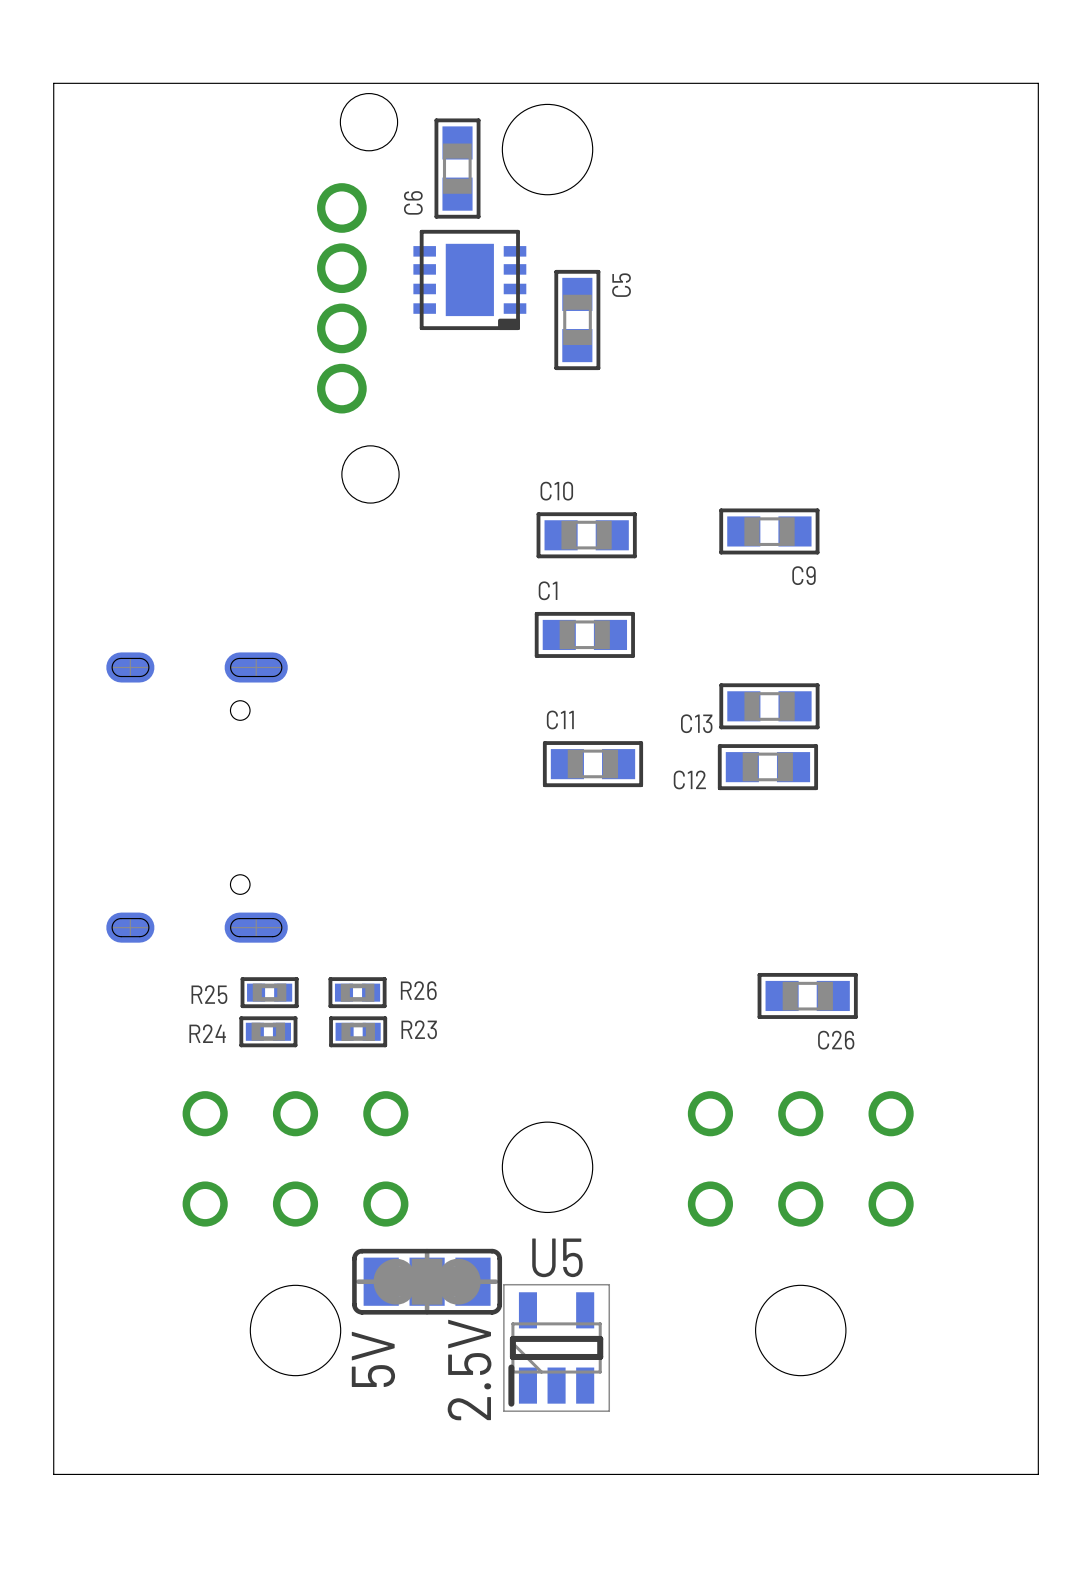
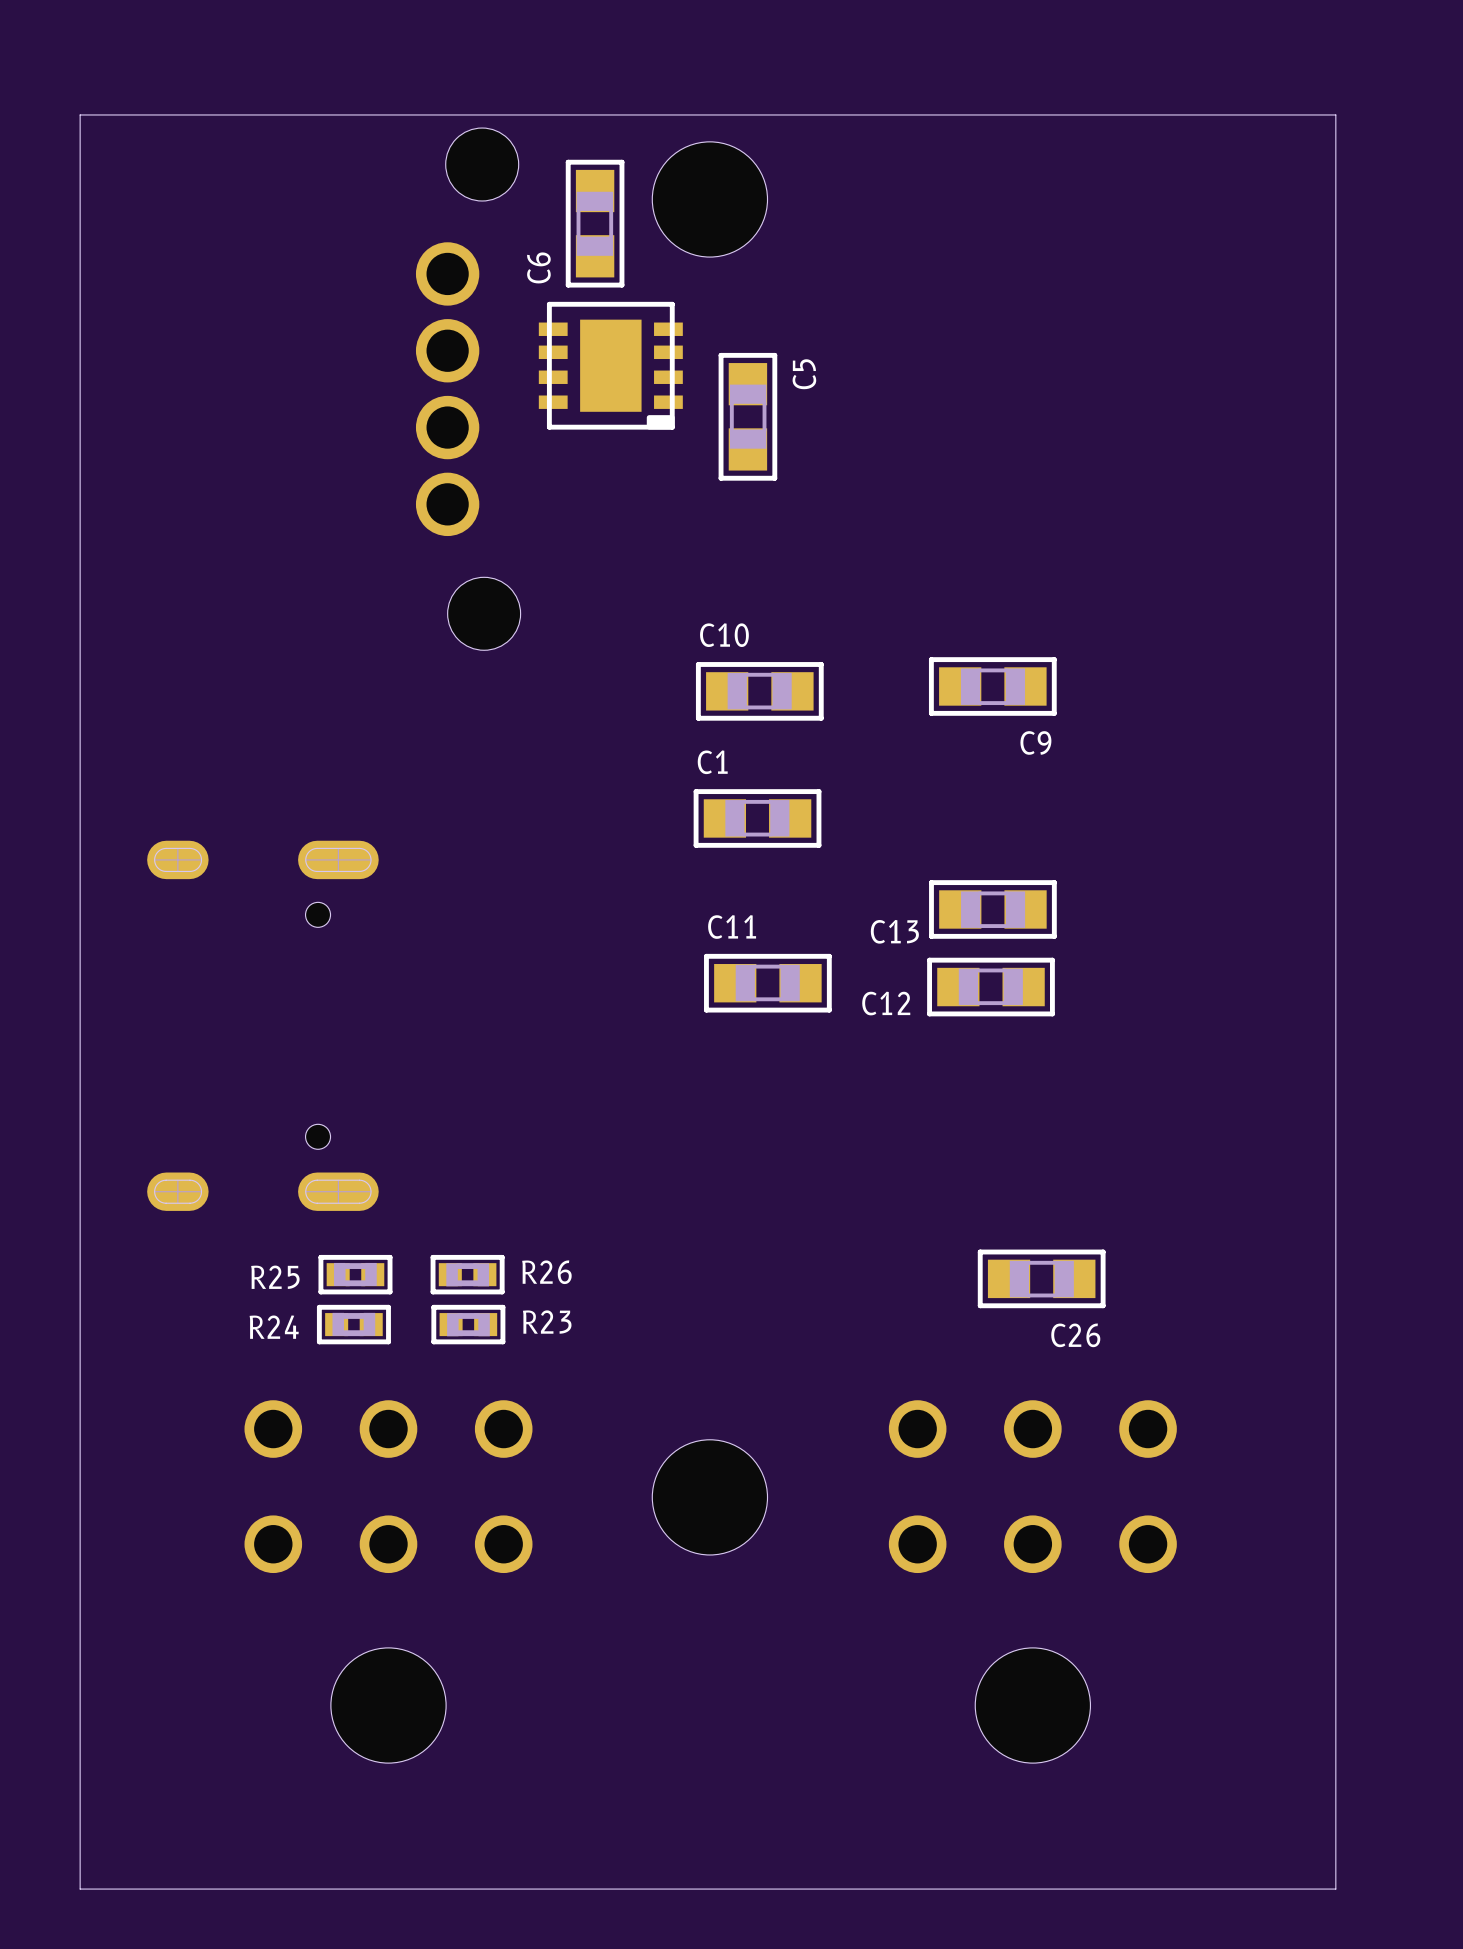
part: (427, 1281) -> none
U5: (556, 1347) -> none
text: 5V (373, 1359) -> none
text: 2.5V (469, 1369) -> none

